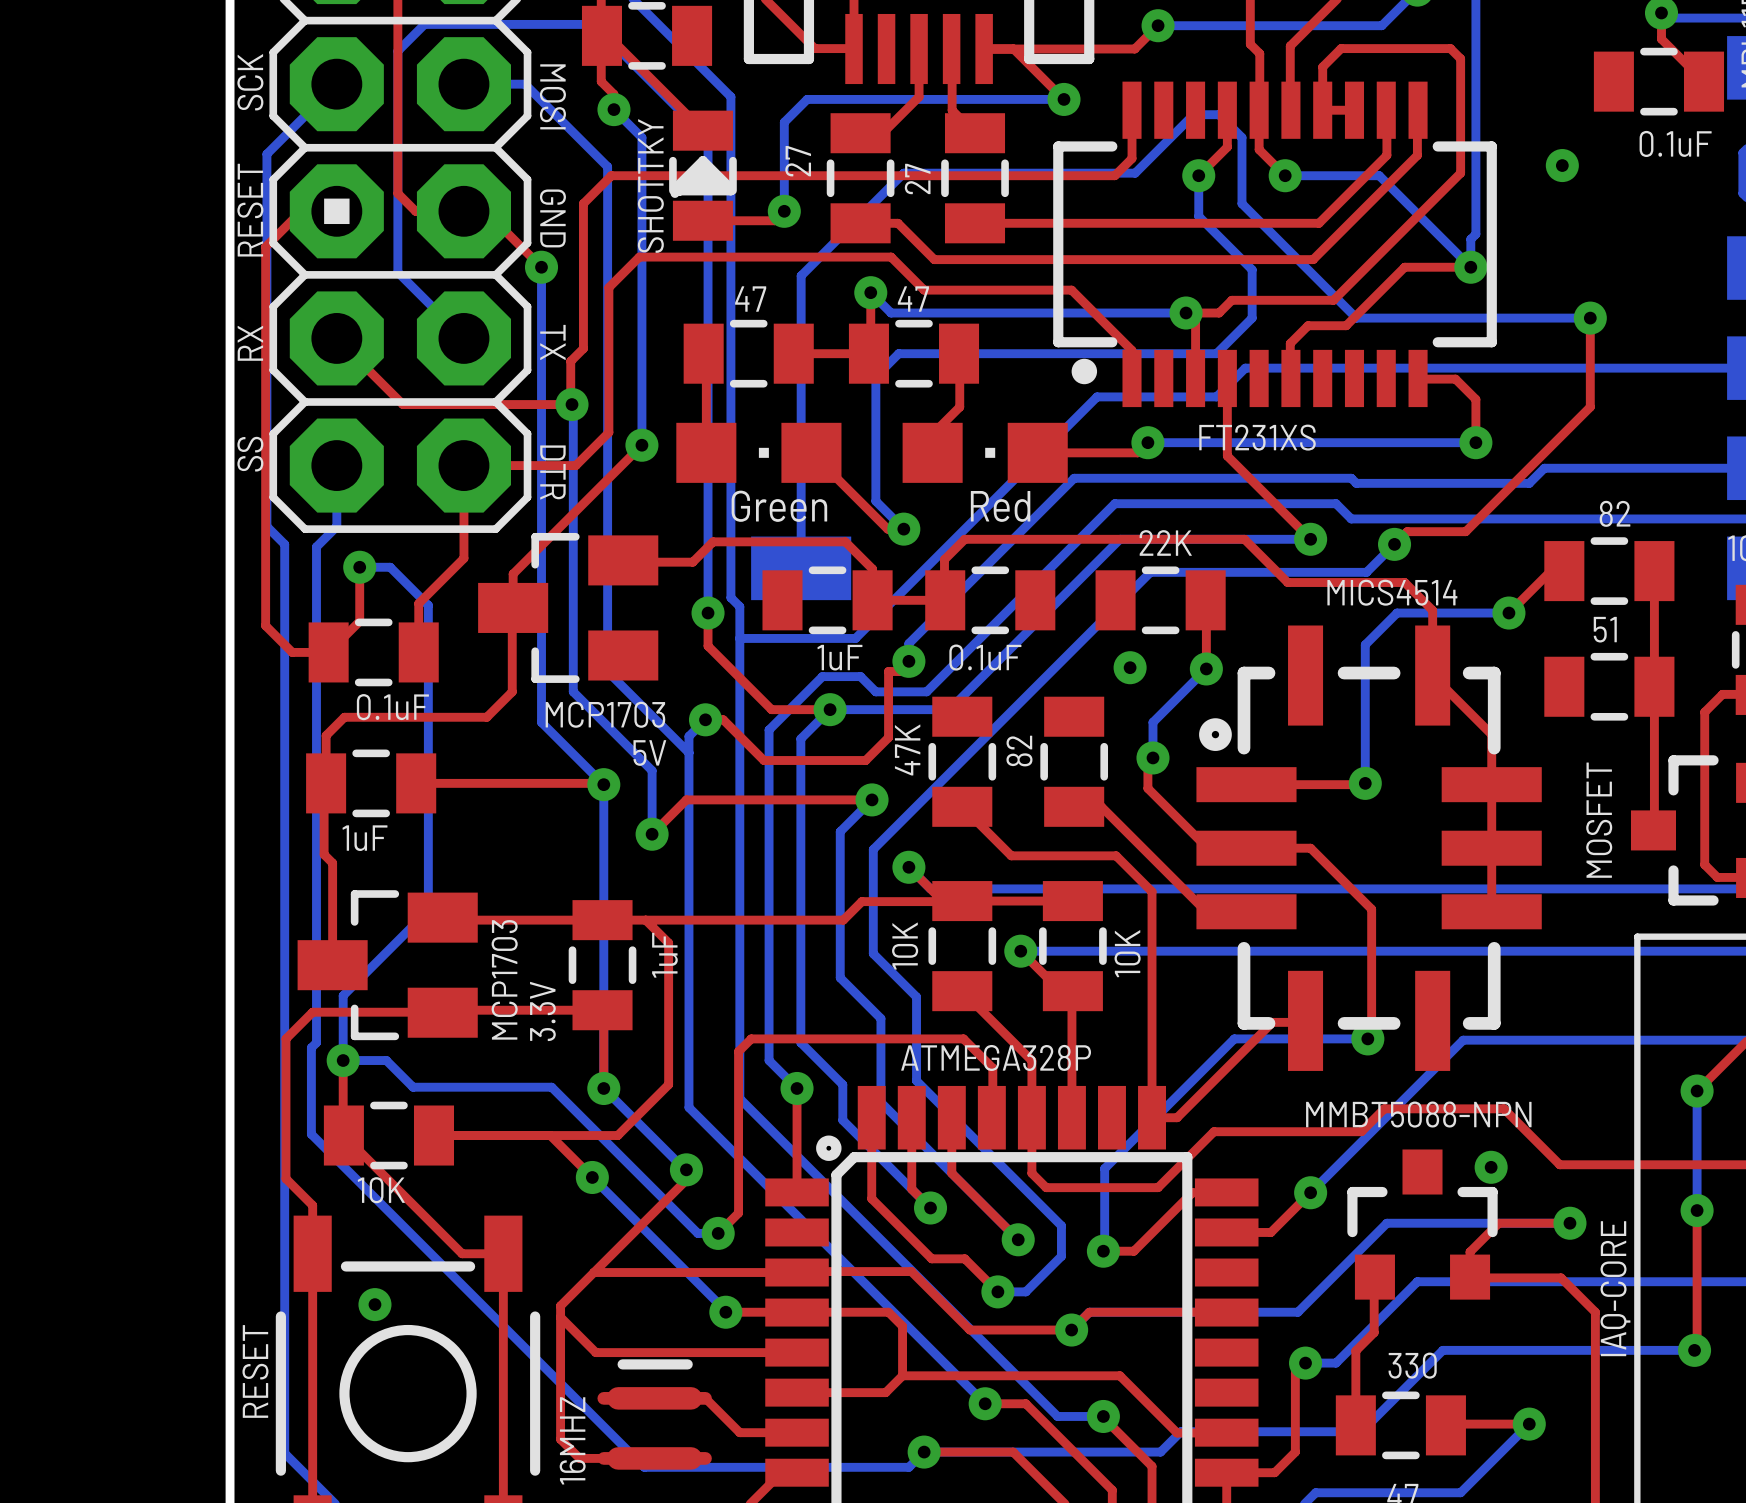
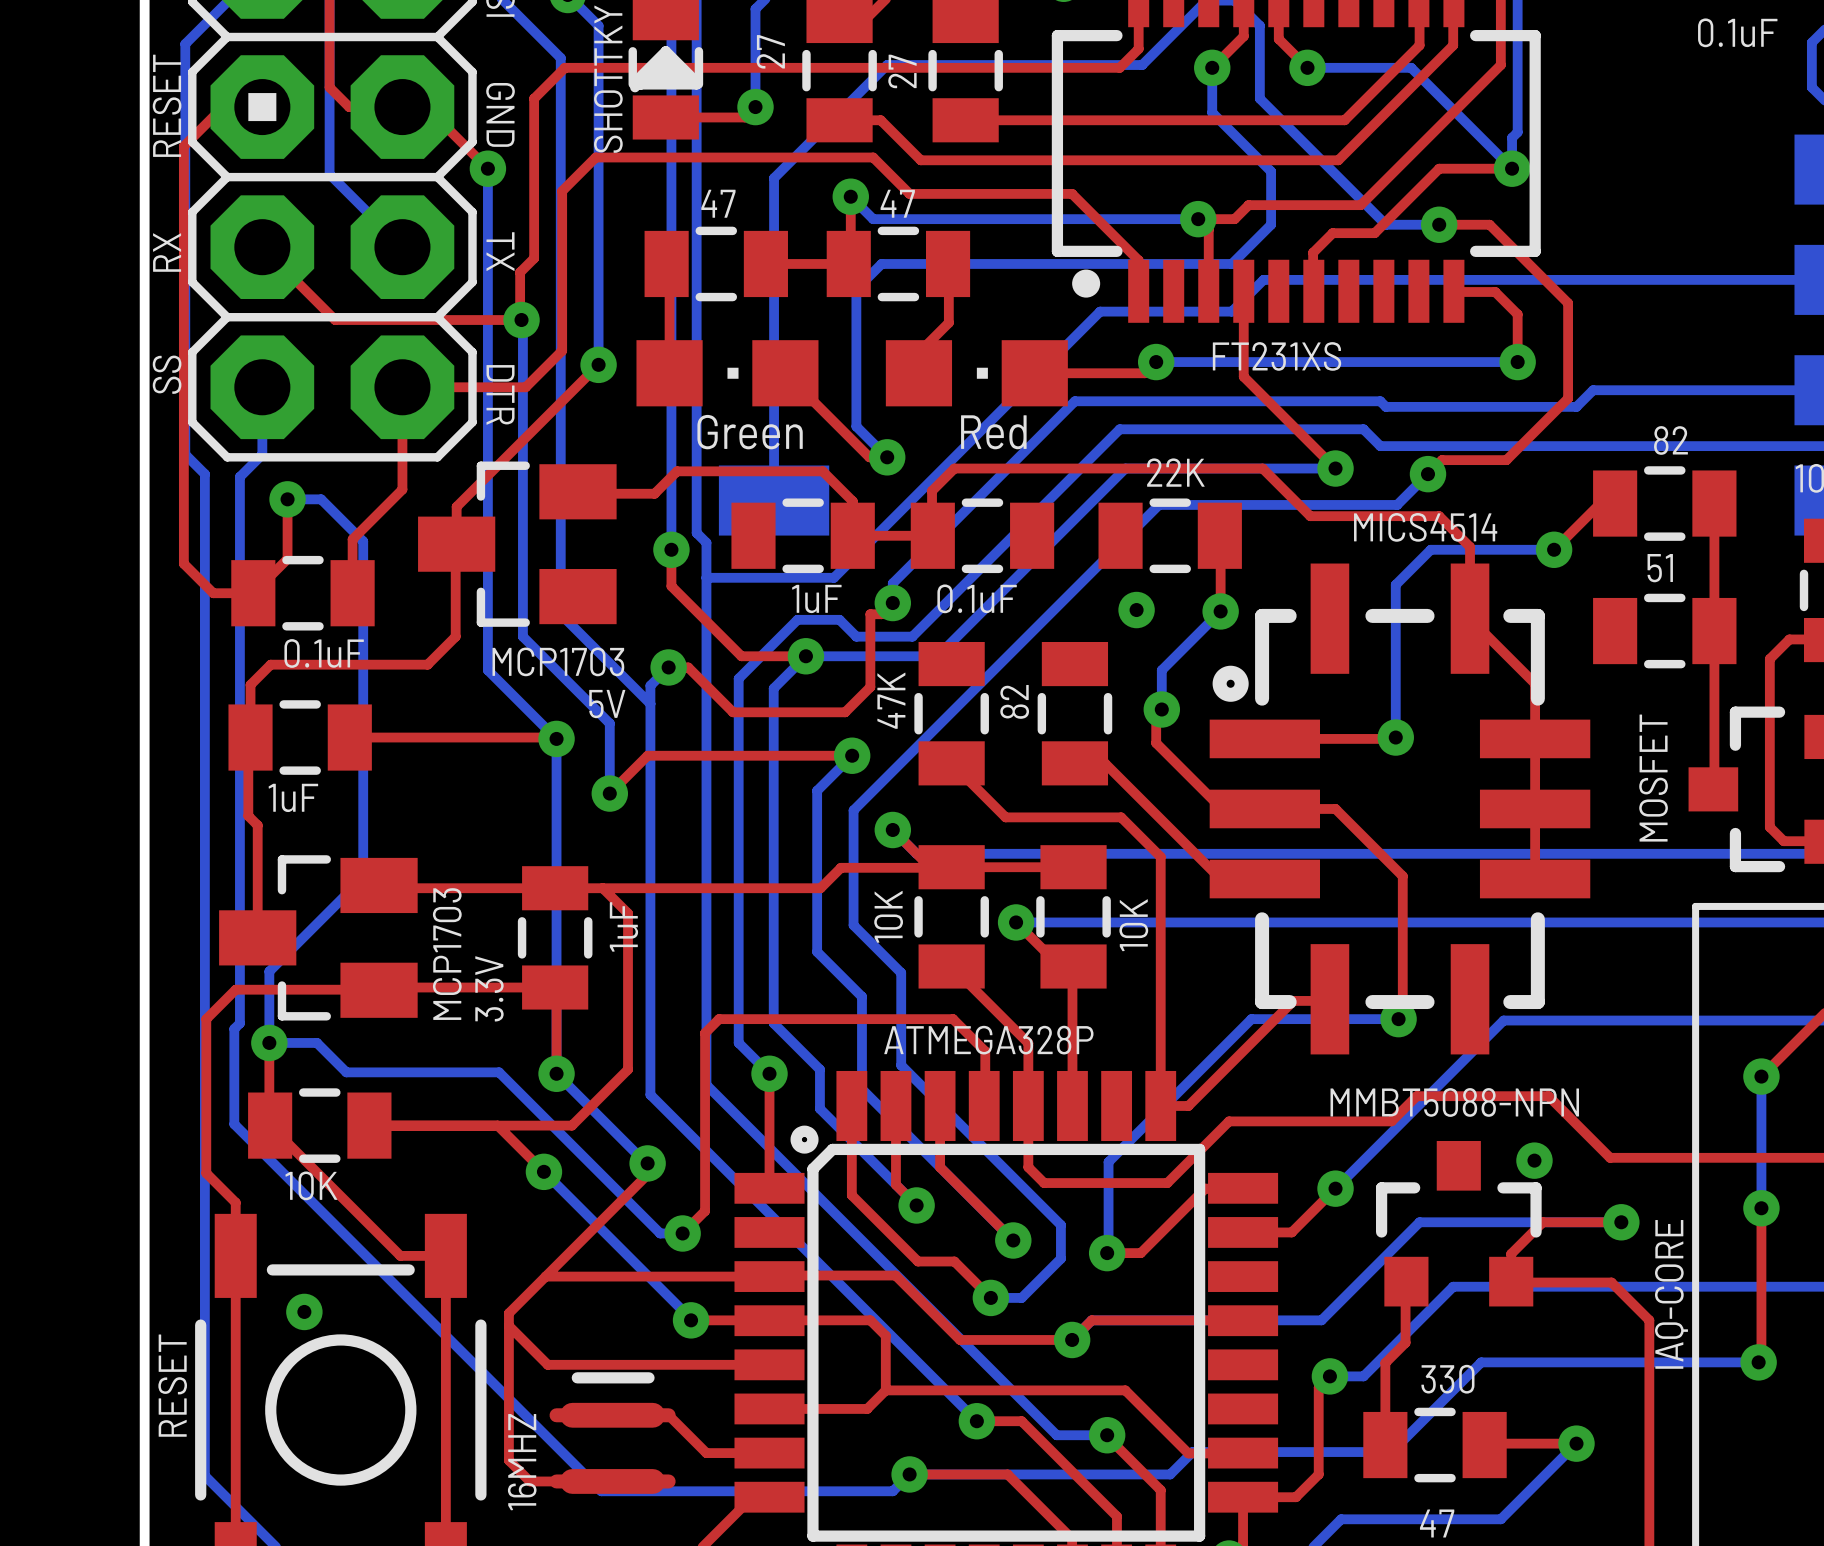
via: (1562, 165) -> none
bottom track: (1404, 318) (1590, 318) -> none
via: none -> (1439, 224)
top track: (1590, 318) (1590, 407) (1521, 475) -> (1439, 224) (1489, 224) (1568, 303) (1568, 398)
via: (1590, 318) -> none

